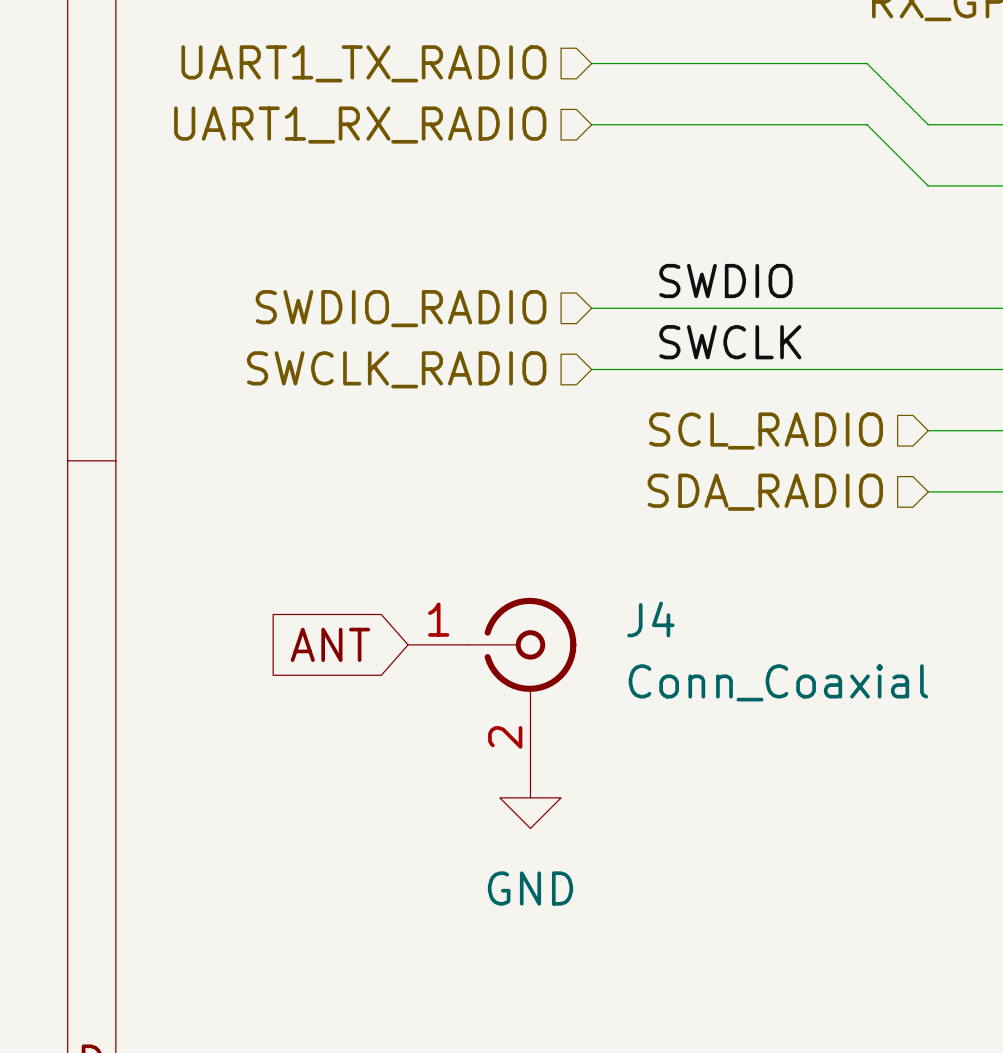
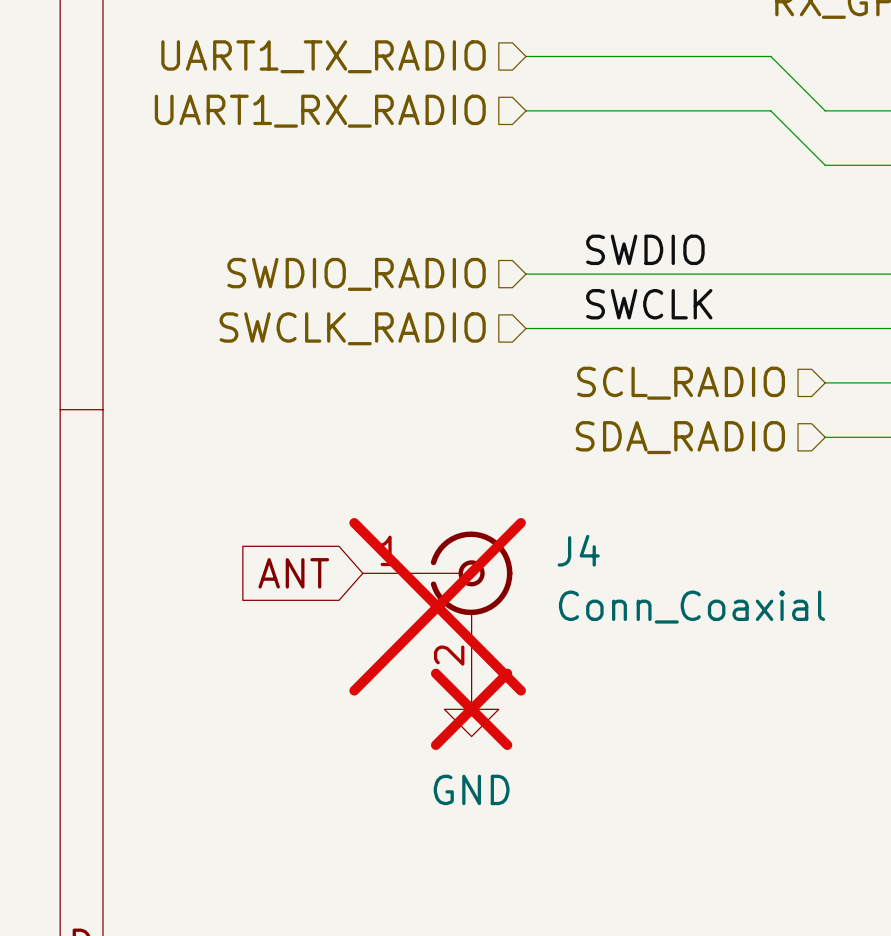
J4 do-not-place cross: none -> (437, 606)
power symbol do-not-place cross: none -> (471, 709)

